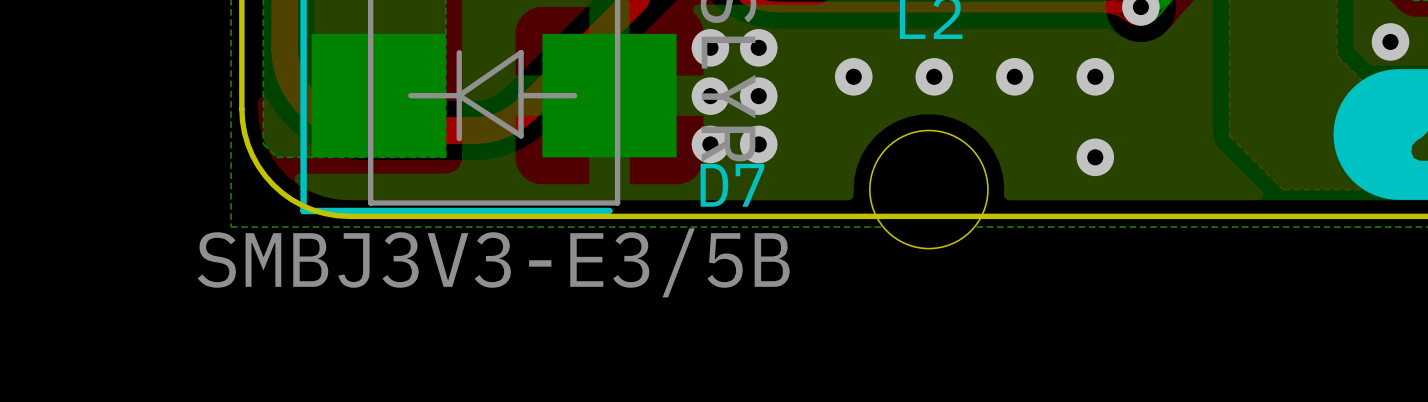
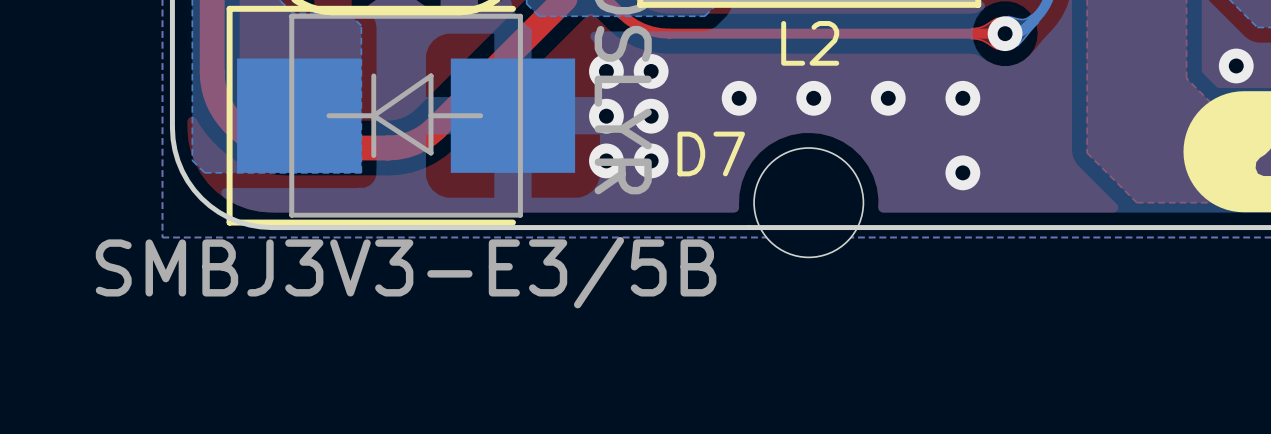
D7 name position: D7 (732, 185) -> D7 (711, 153)

